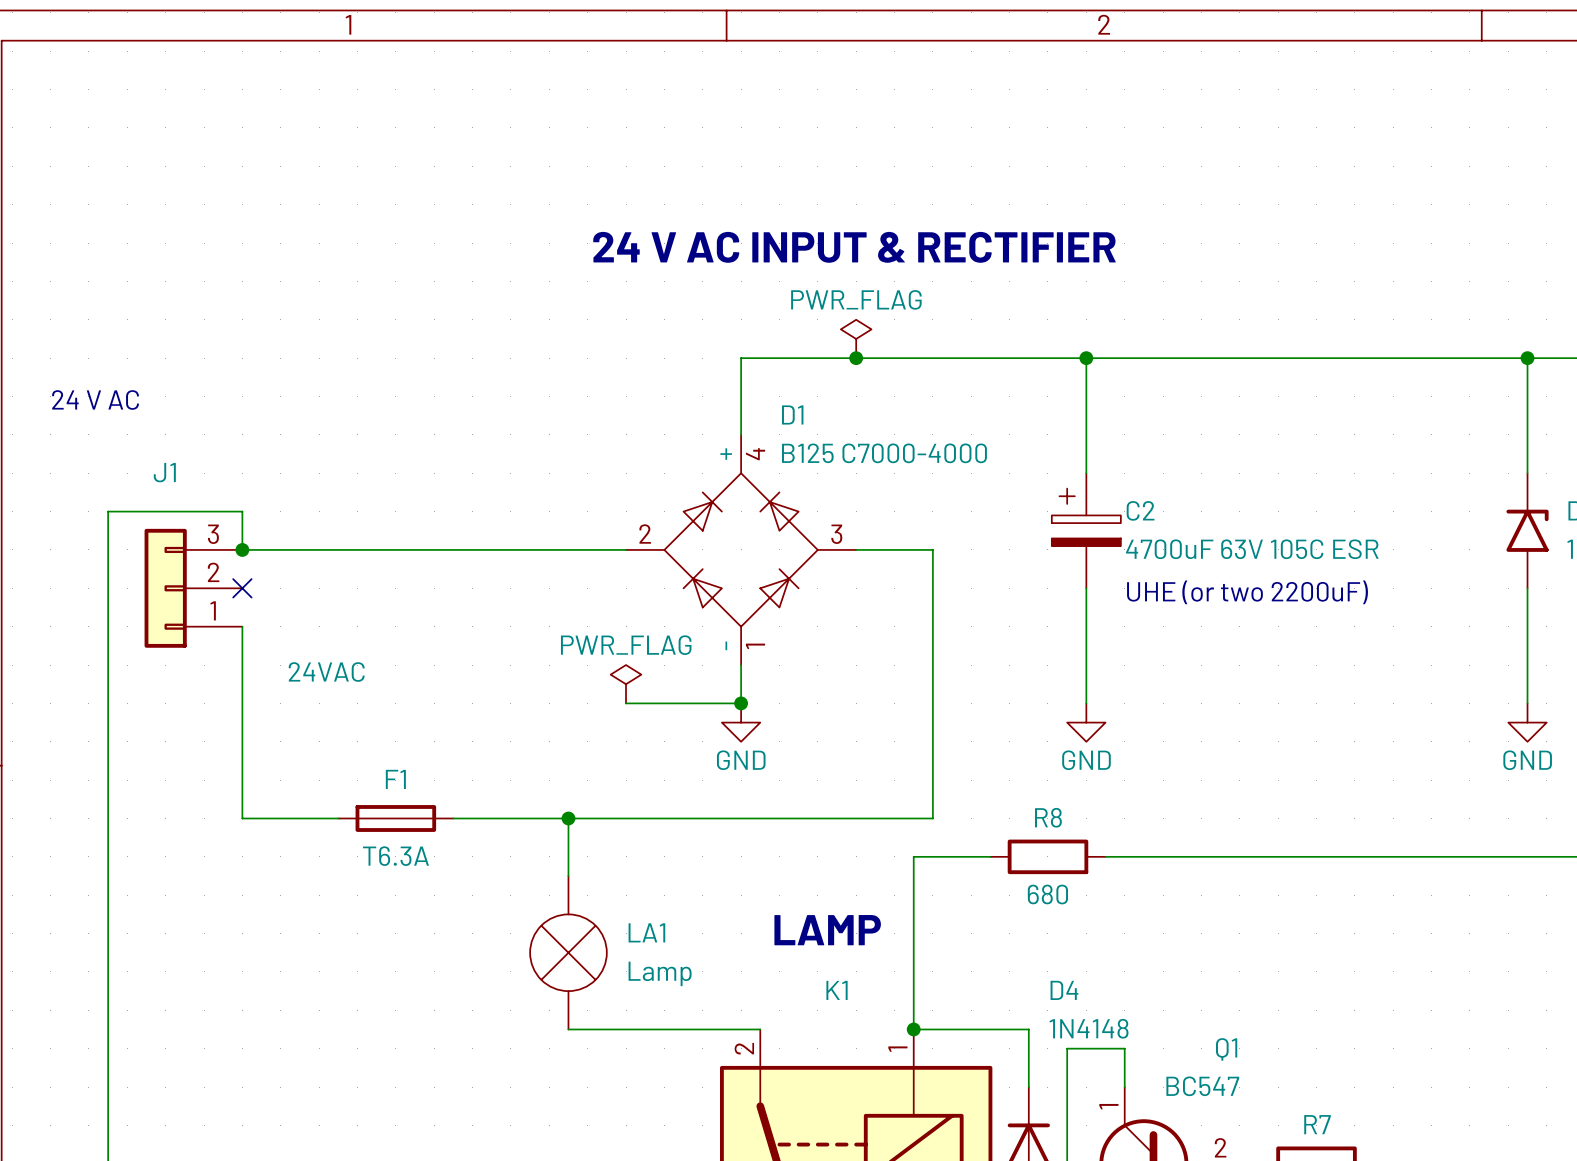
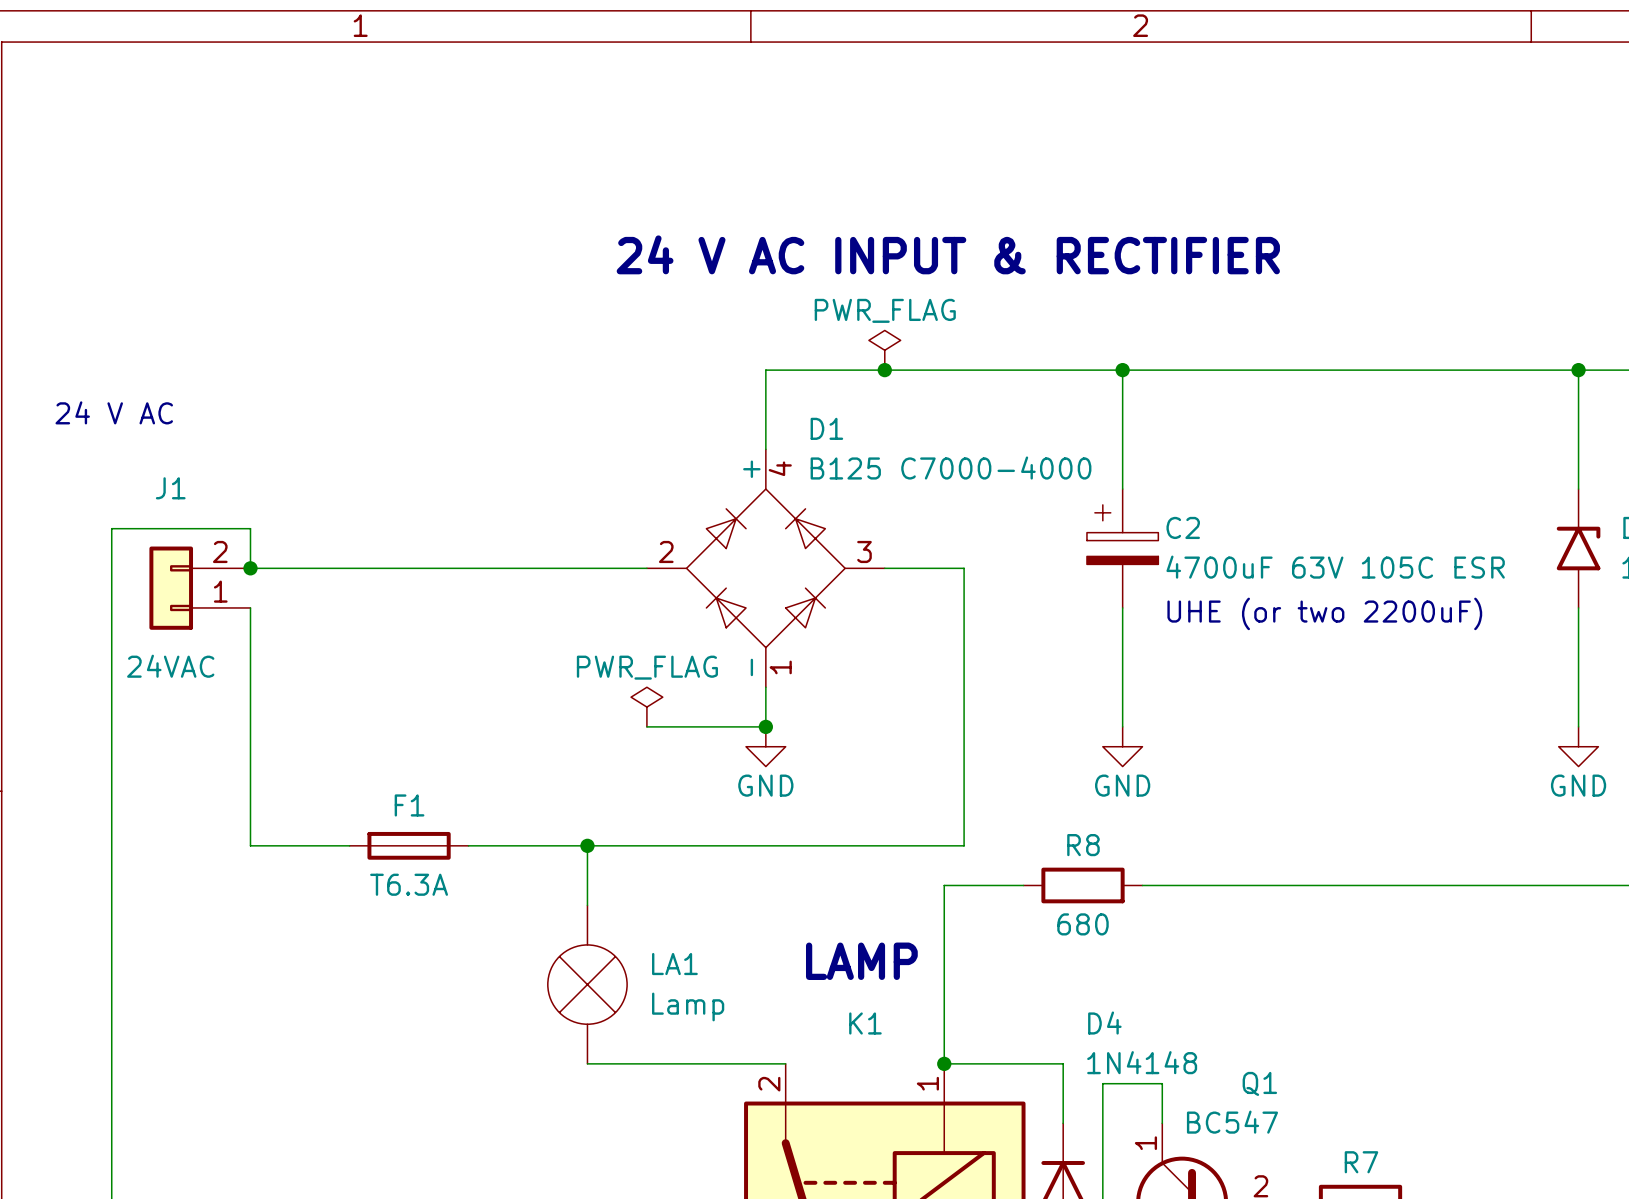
J1 symbol: [144, 528, 243, 648] -> [149, 546, 251, 630]
wire: none -> (250, 607) (250, 647)
no-connect mark: (242, 588) -> none
J1 value position: 24VAC (326, 672) -> 24VAC (170, 666)

